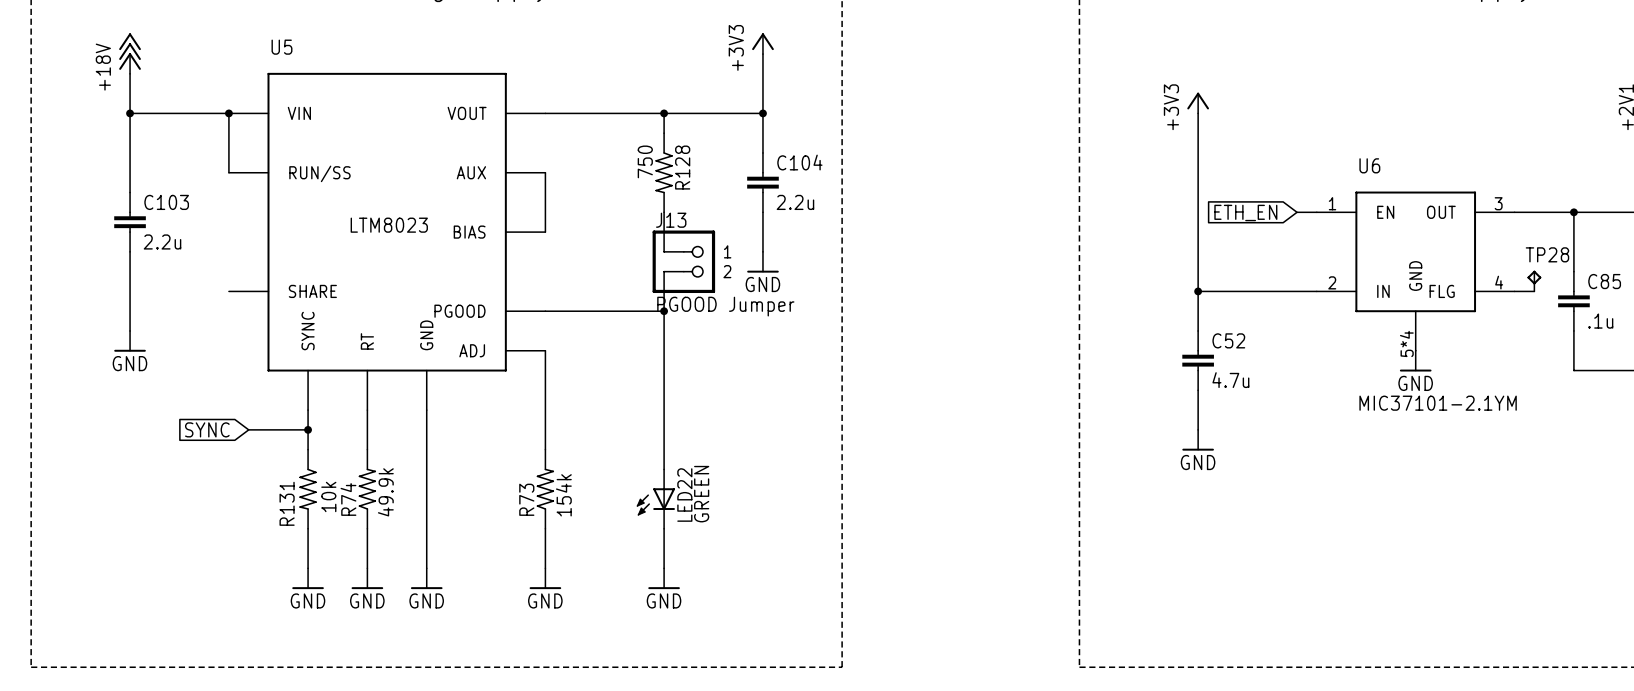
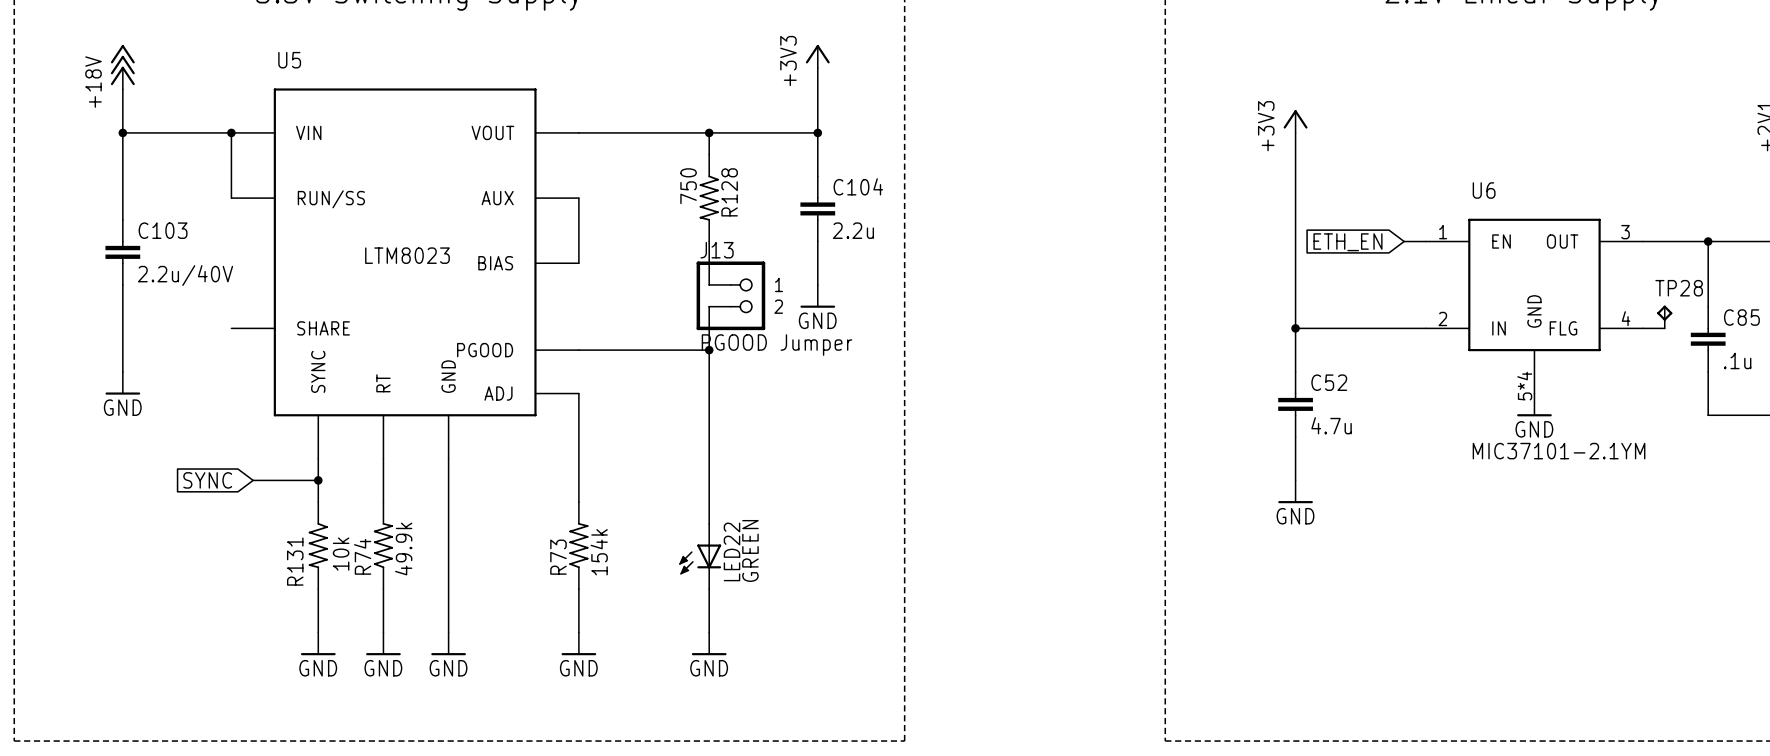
C103 value: 2.2u (162, 241) -> 2.2u/40V (185, 275)

